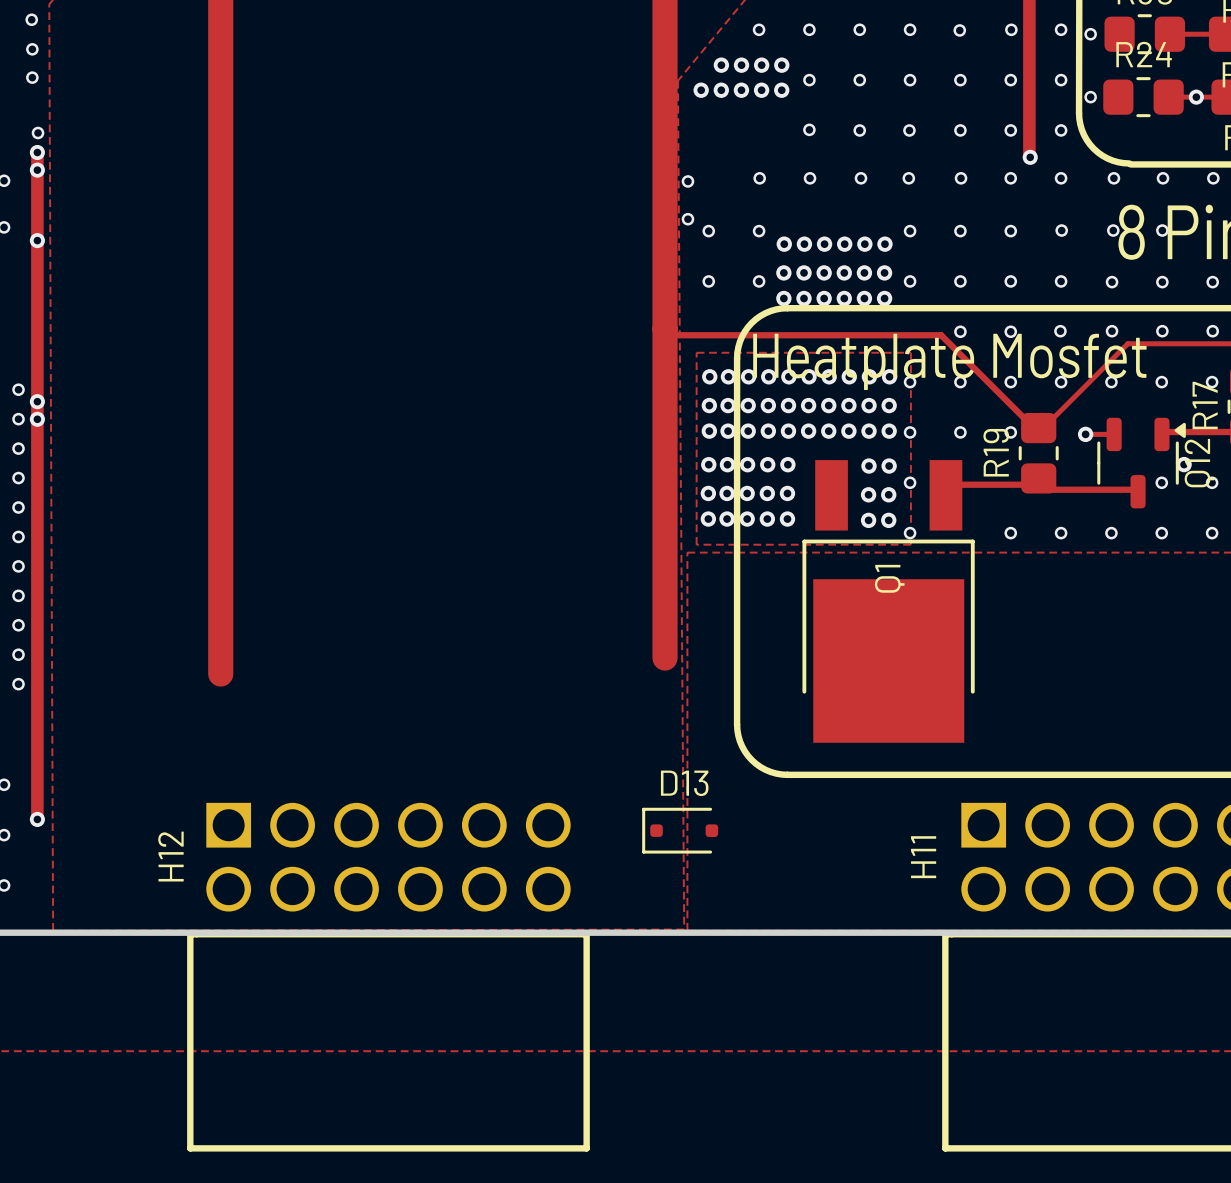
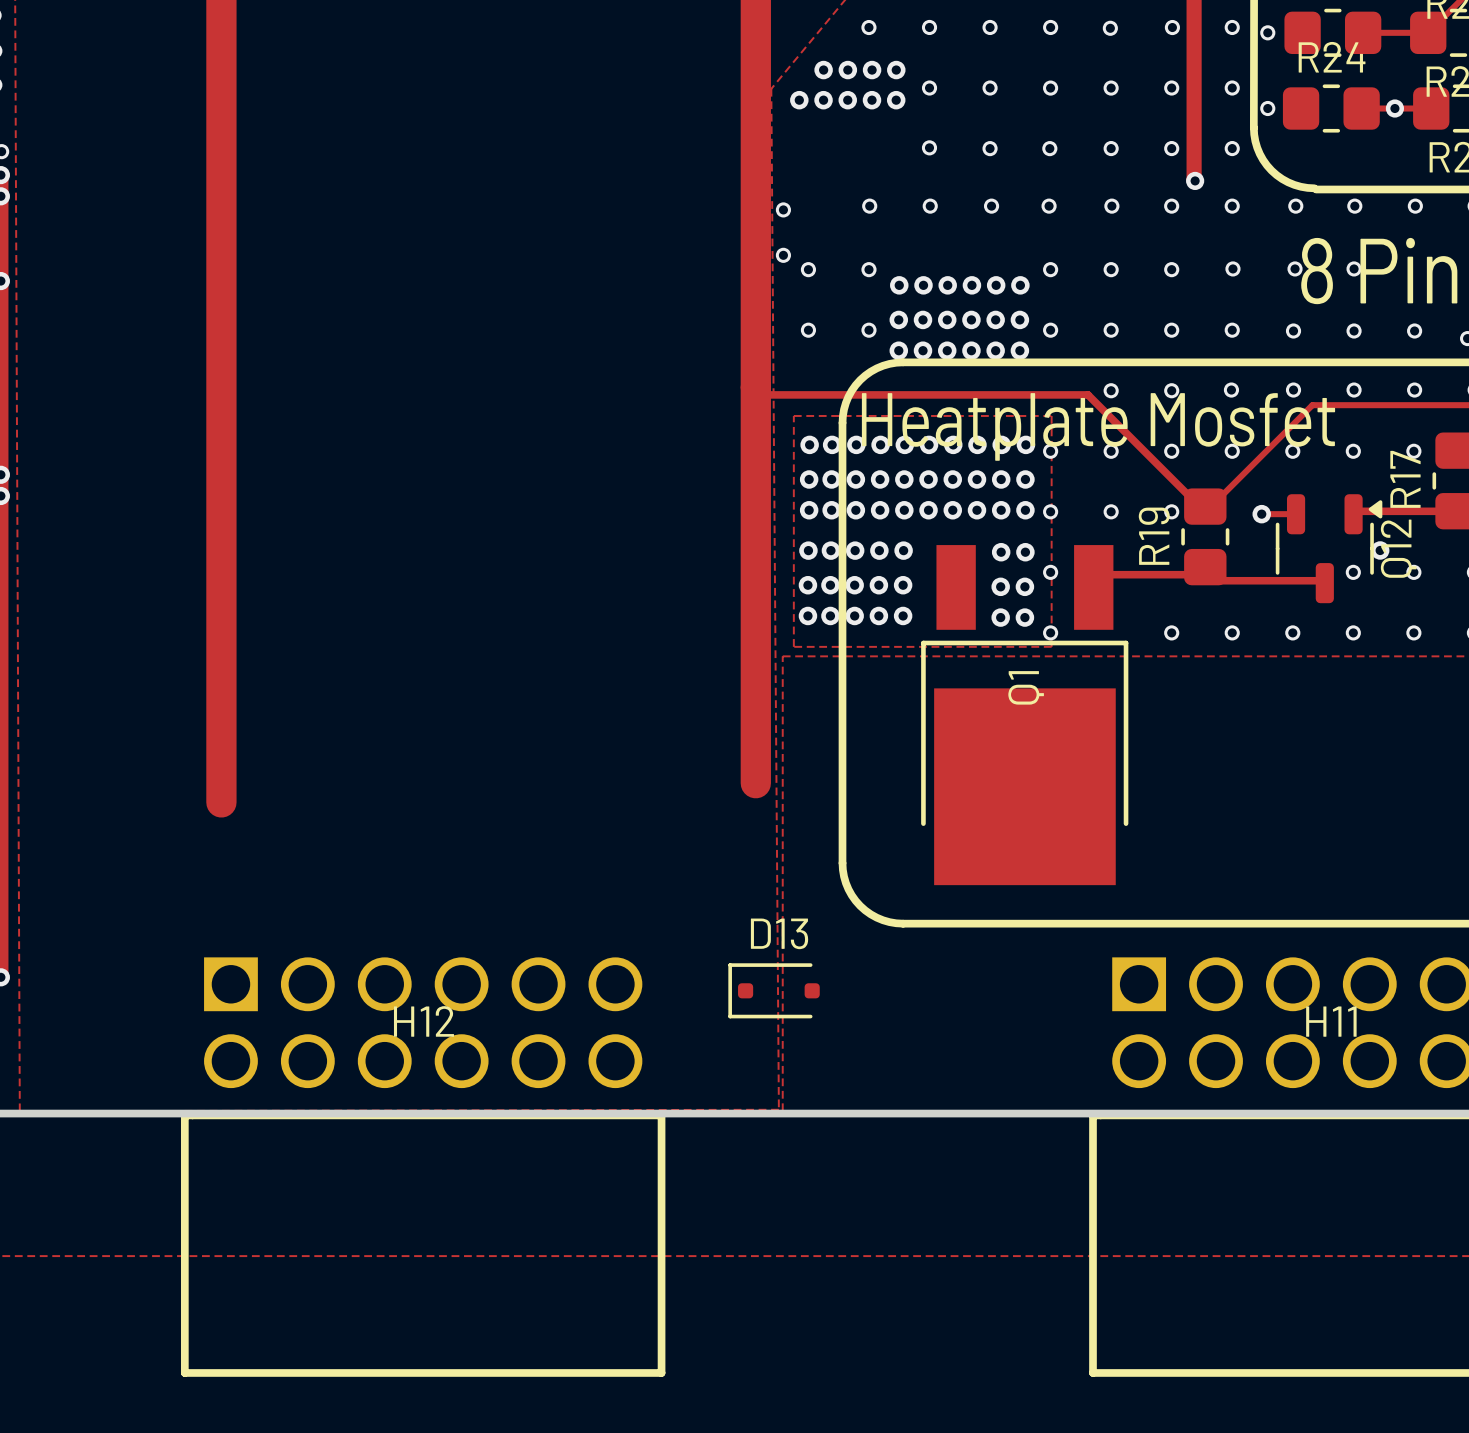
H12 name rotation: 0° (170, 856) -> 90° clockwise (423, 1021)
H12 name position: H12 (170, 856) -> H12 (423, 1021)
H11 name rotation: 0° (923, 857) -> 90° clockwise (1331, 1021)
H11 name position: H11 (923, 857) -> H11 (1331, 1021)

